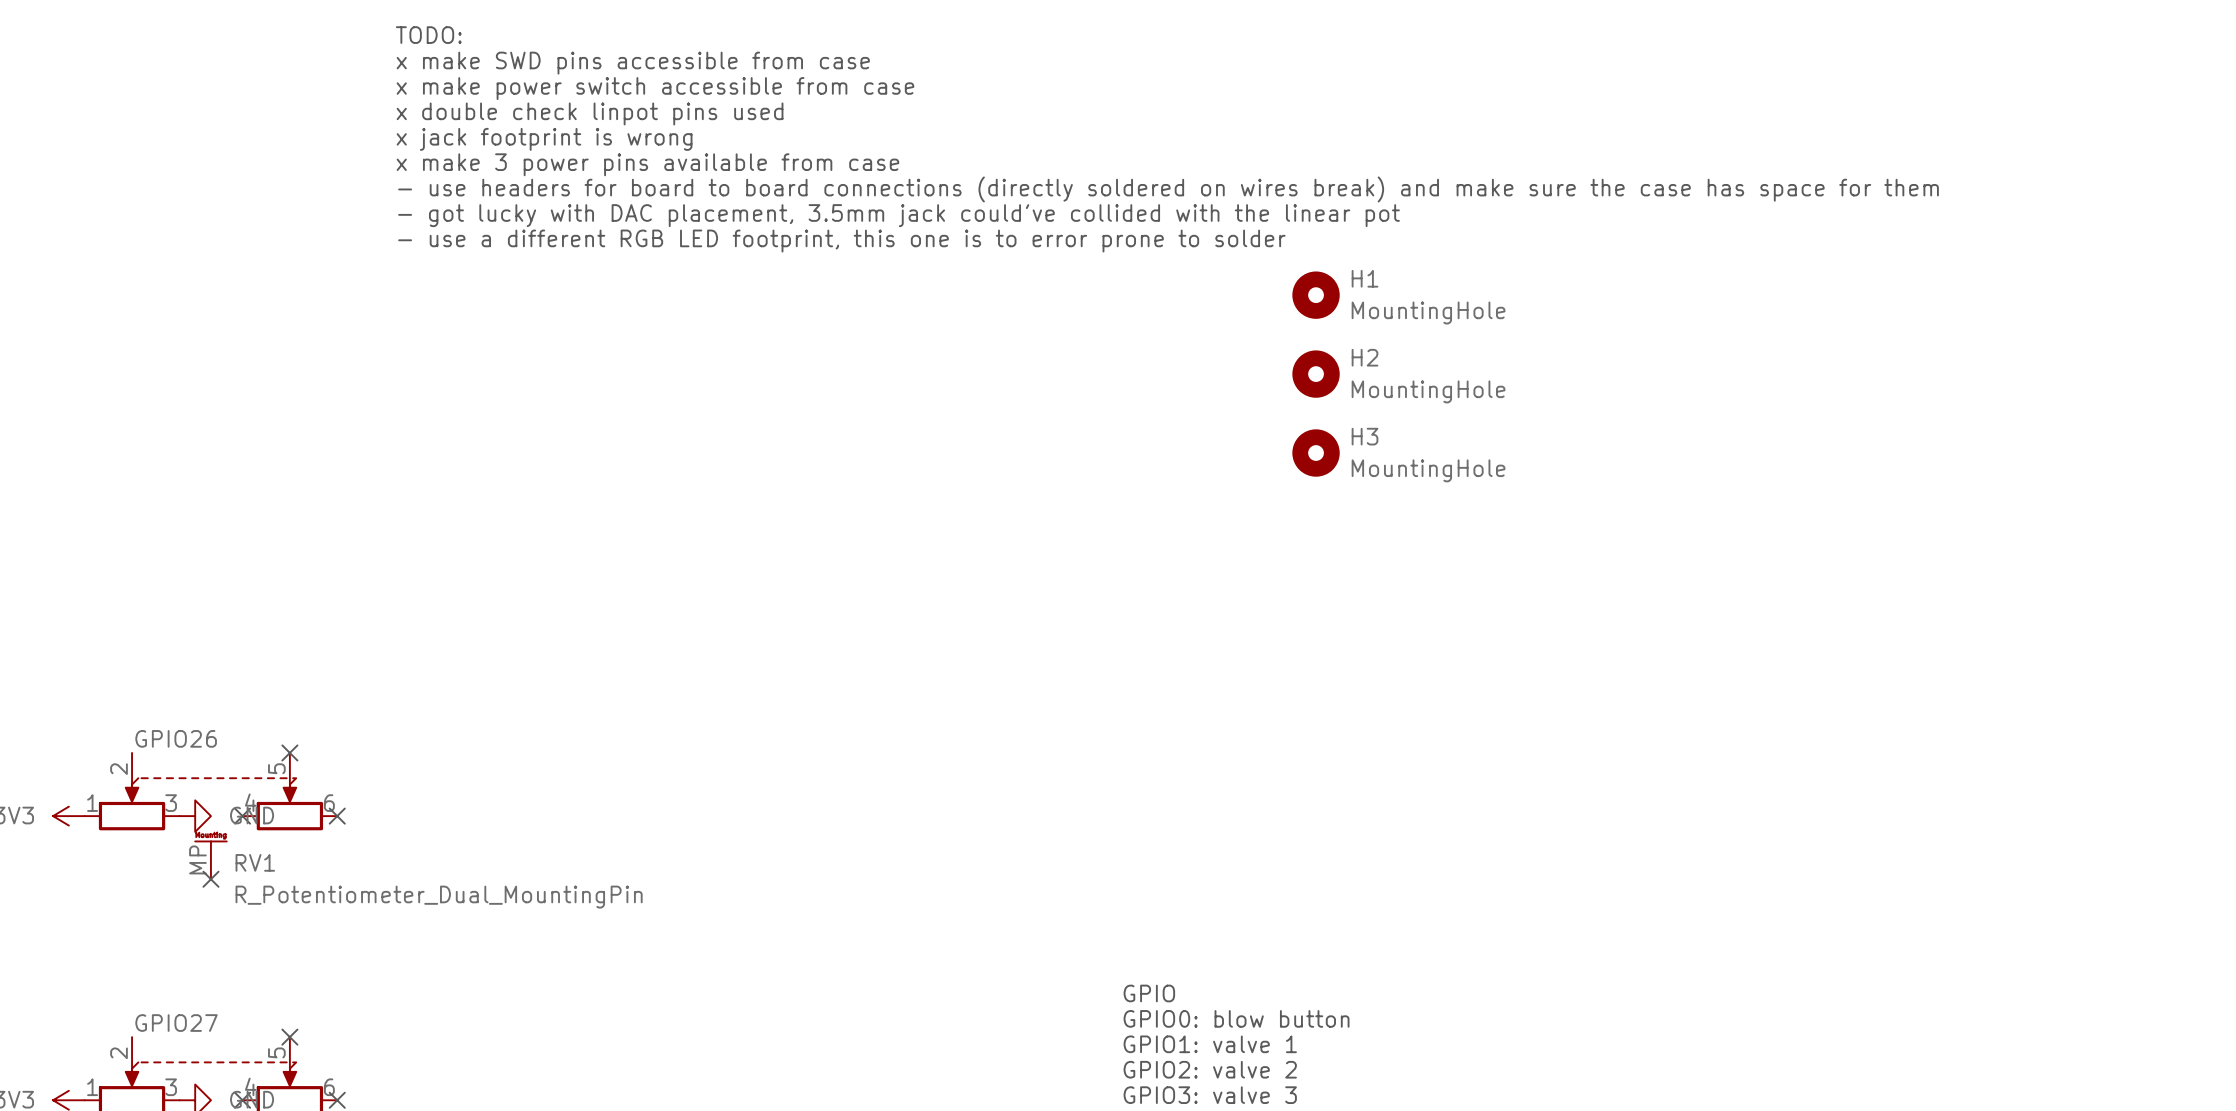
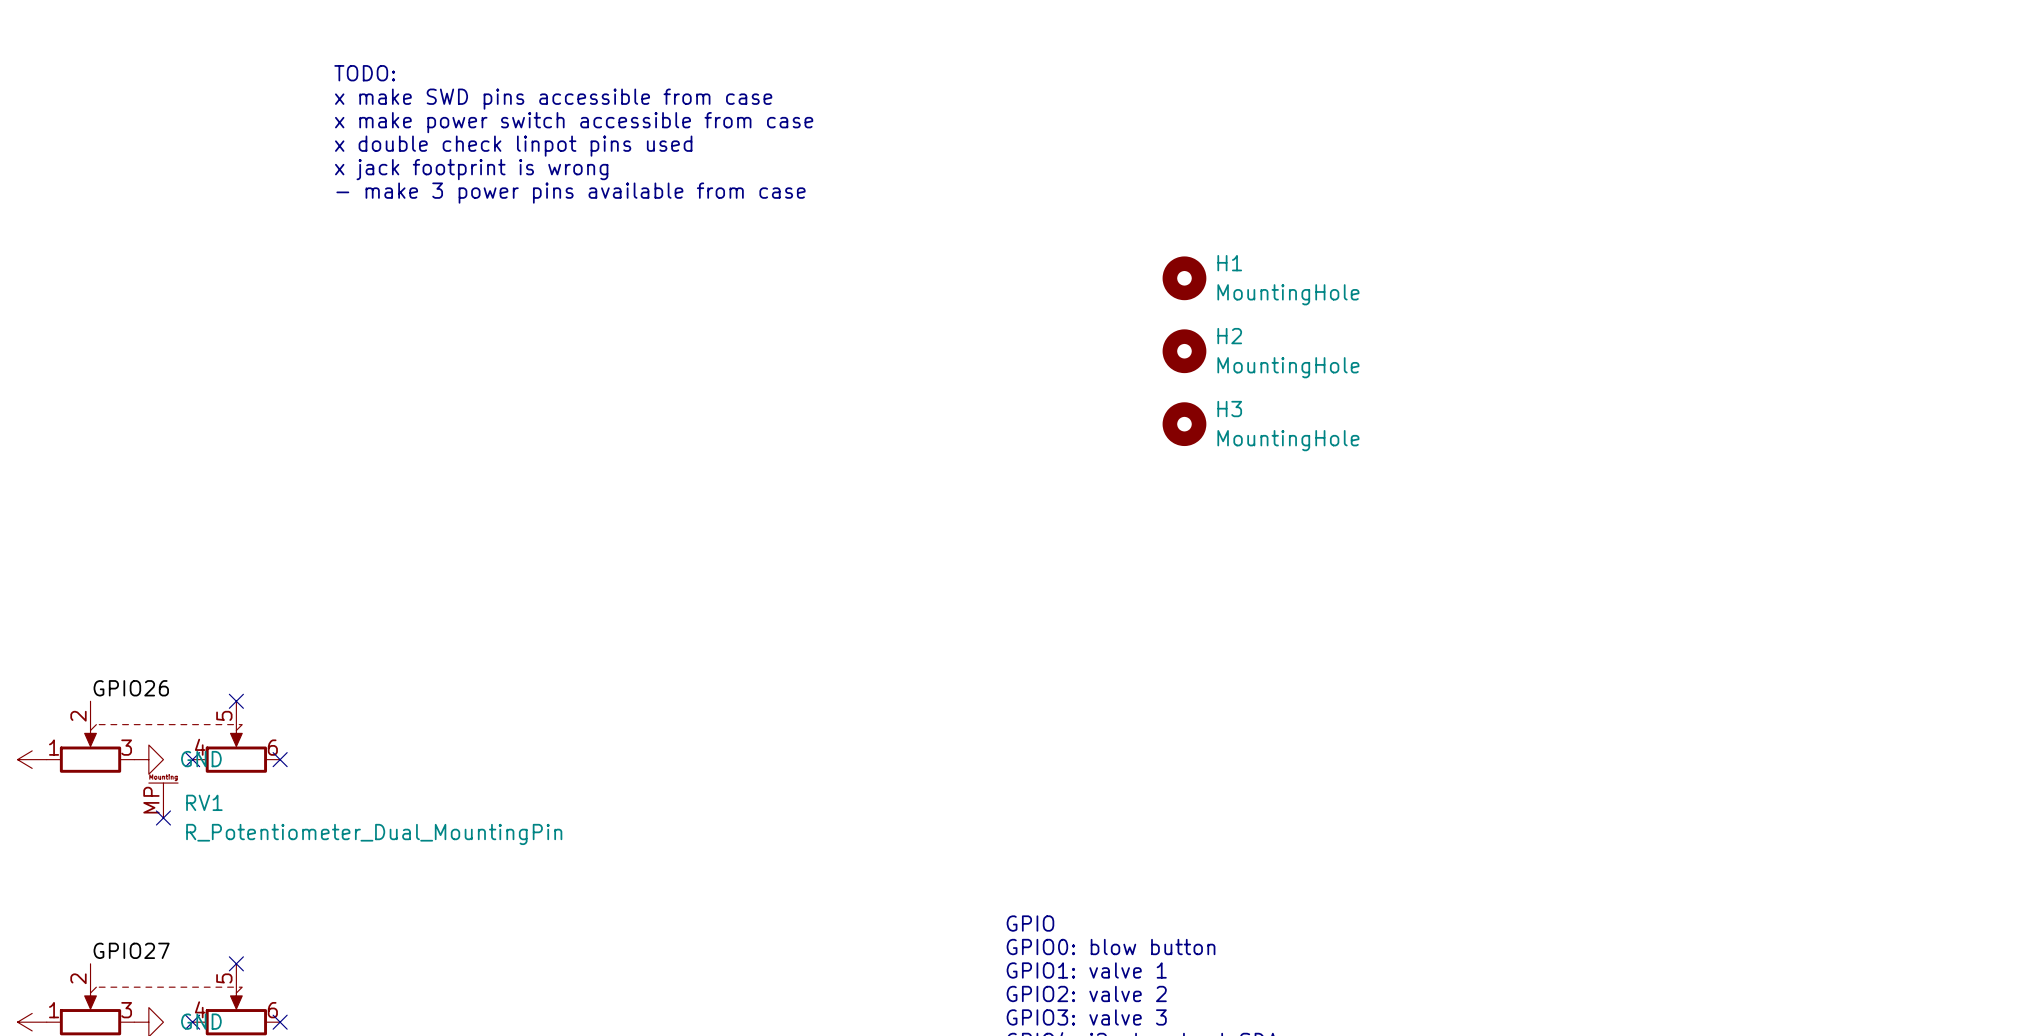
text position: TODO: (428, 35) -> TODO: (364, 73)
text position: x make SWD pins accessible from case (633, 63) -> x make SWD pins accessible from case (553, 99)
text position: x make power switch accessible from case (655, 88) -> x make power switch accessible from case (574, 122)
text position: x double check linpot pins used (590, 113) -> x double check linpot pins used (513, 146)
text position: x jack footprint is wrong (544, 139) -> x jack footprint is wrong (471, 169)
text: x make 3 power pins available from case (647, 164) -> none
text: - use headers for board to board connections (directly soldered on wires break) and make sure the case has space for them (1168, 189) -> none
text: none -> - make 3 power pins available from case (570, 193)
text: - got lucky with DAC placement, 3.5mm jack could've collided with the linear pot (899, 215) -> none
text: - use a different RGB LED footprint, this one is to error prone to solder (841, 241) -> none

